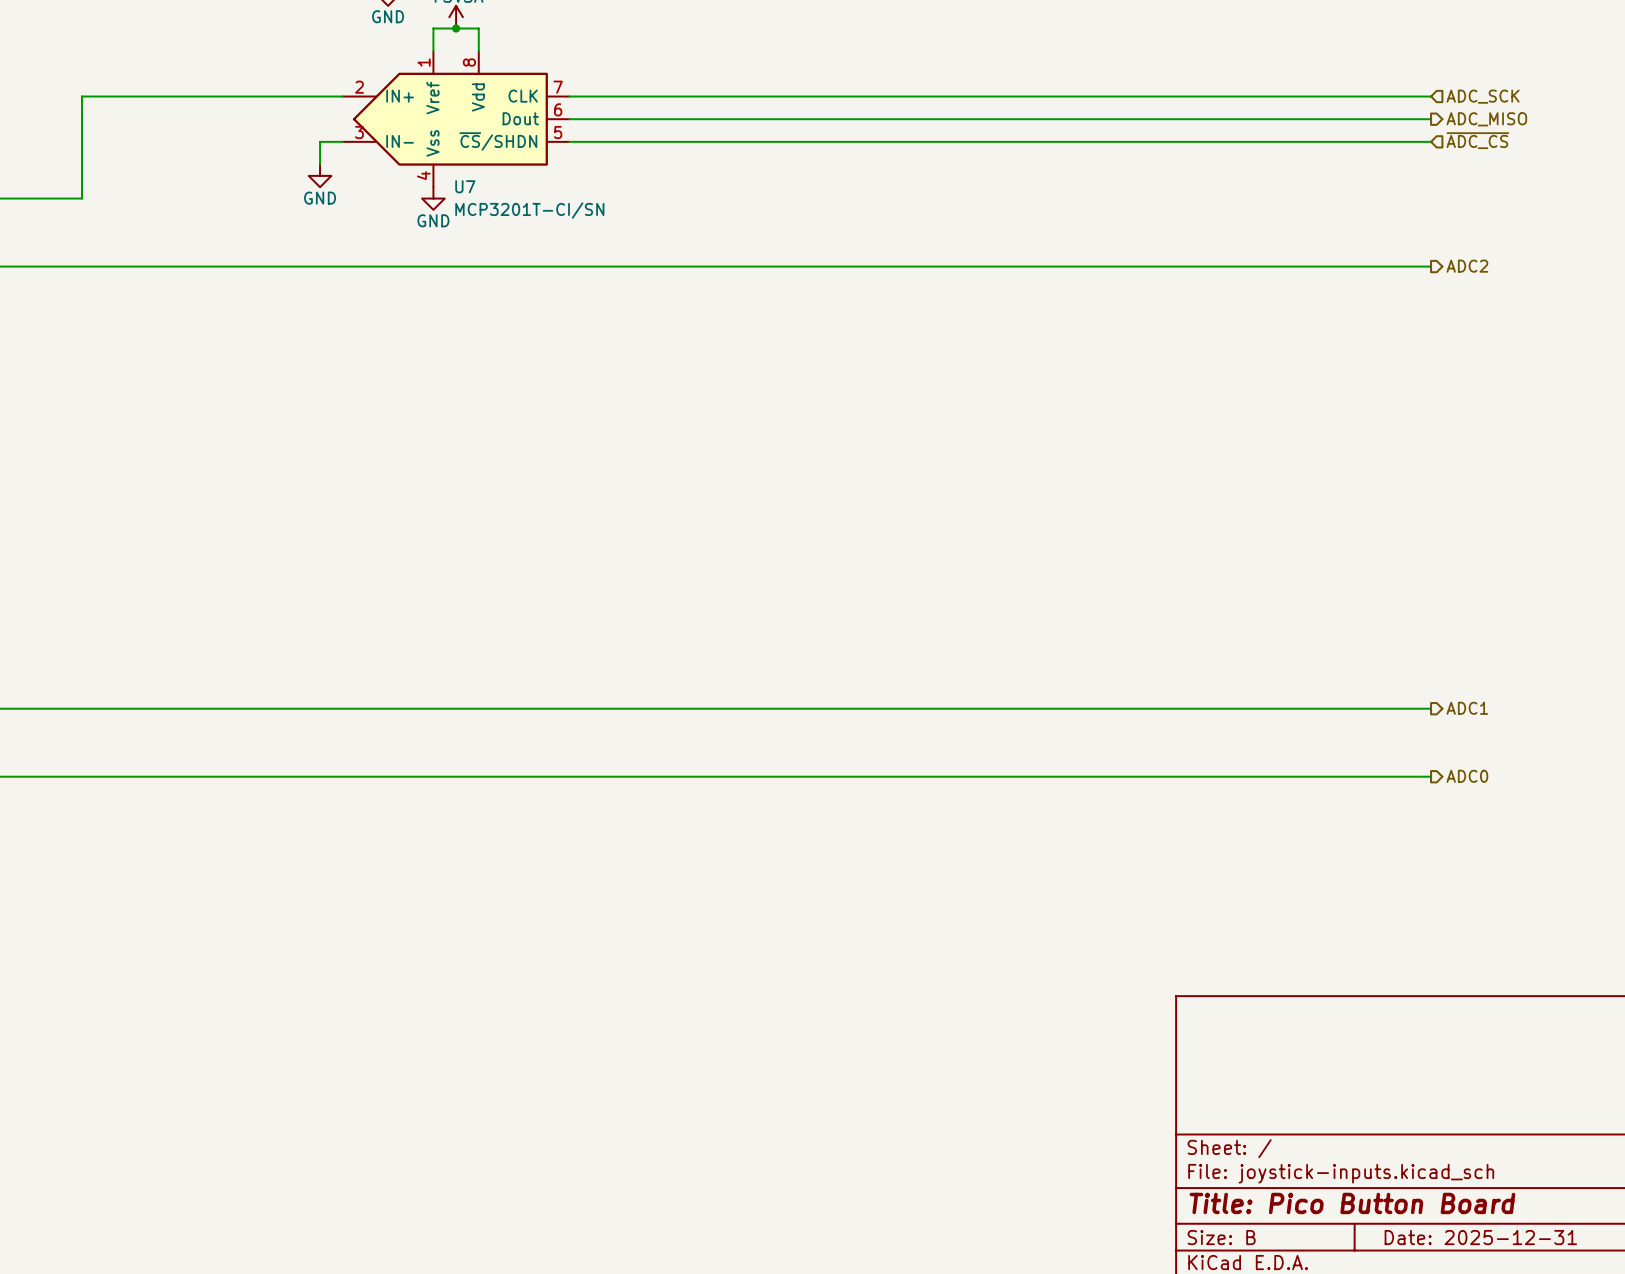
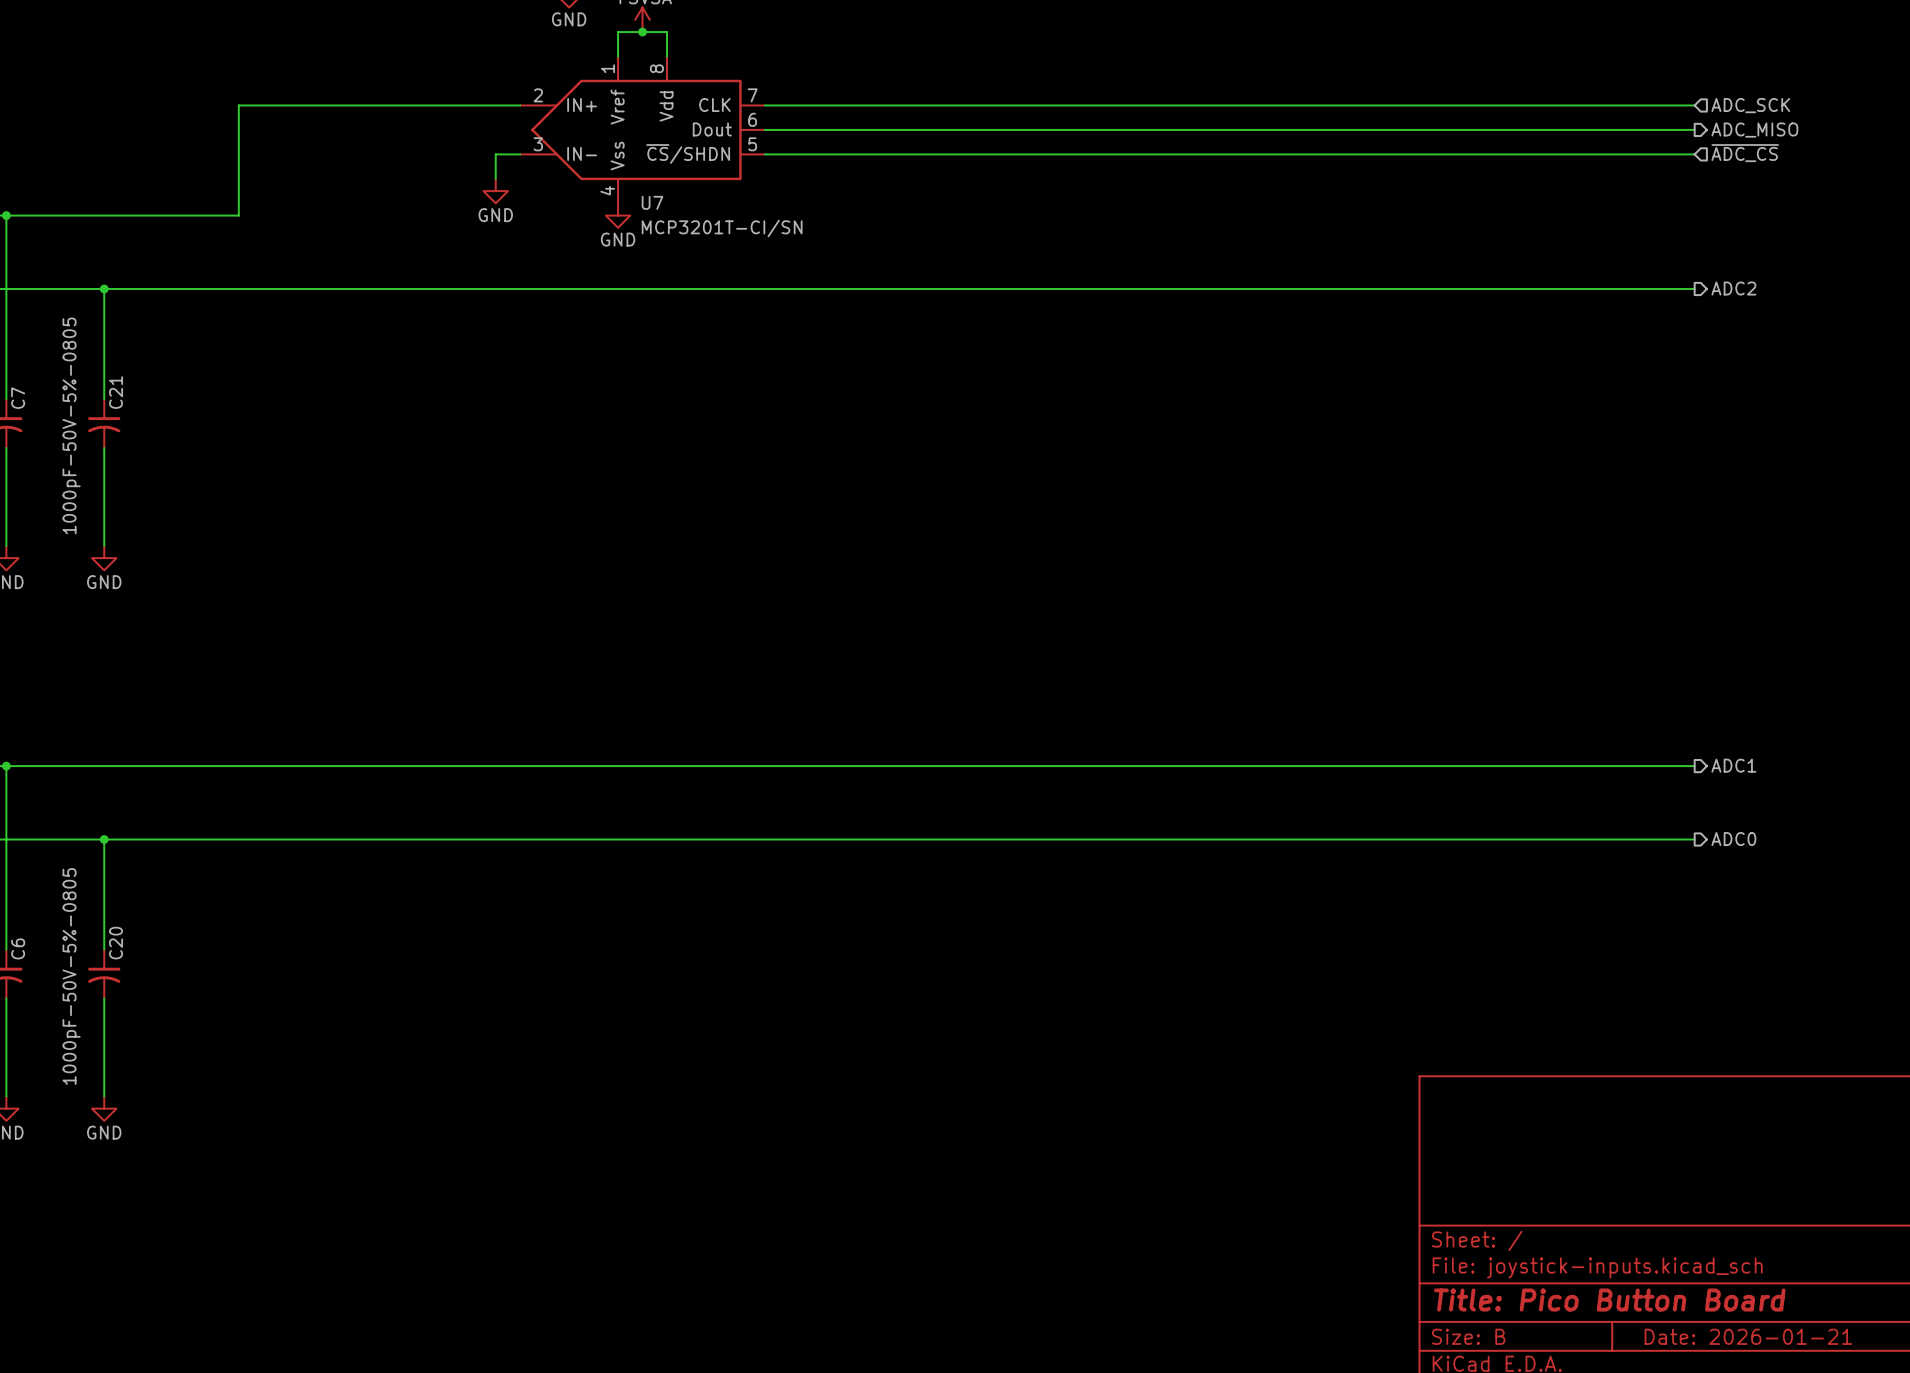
title block: Date: 2025-12-31 (1480, 1237) -> Date: 2026-01-21 (1748, 1336)

